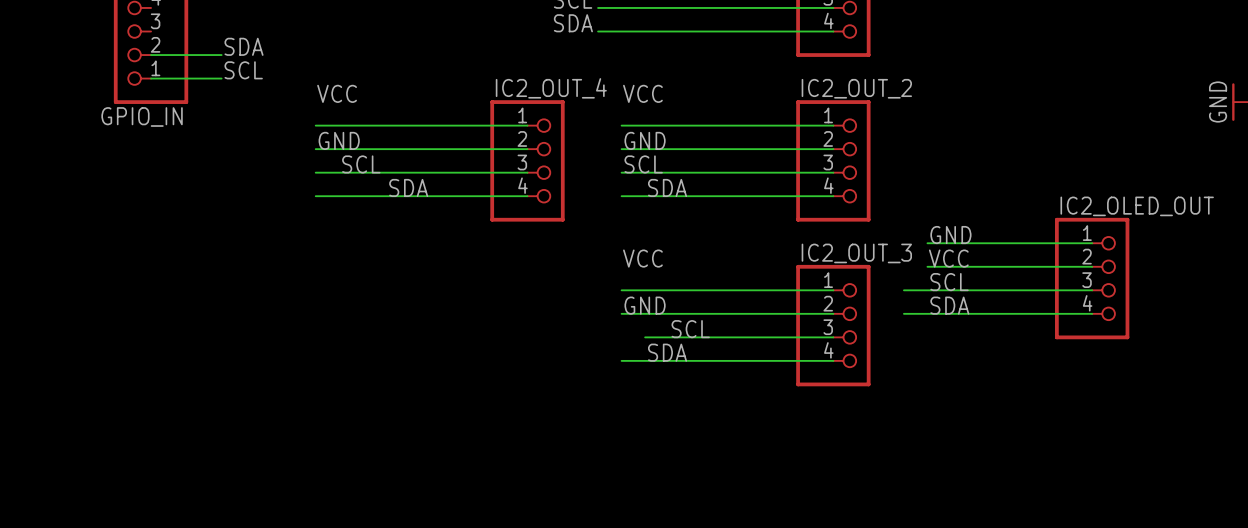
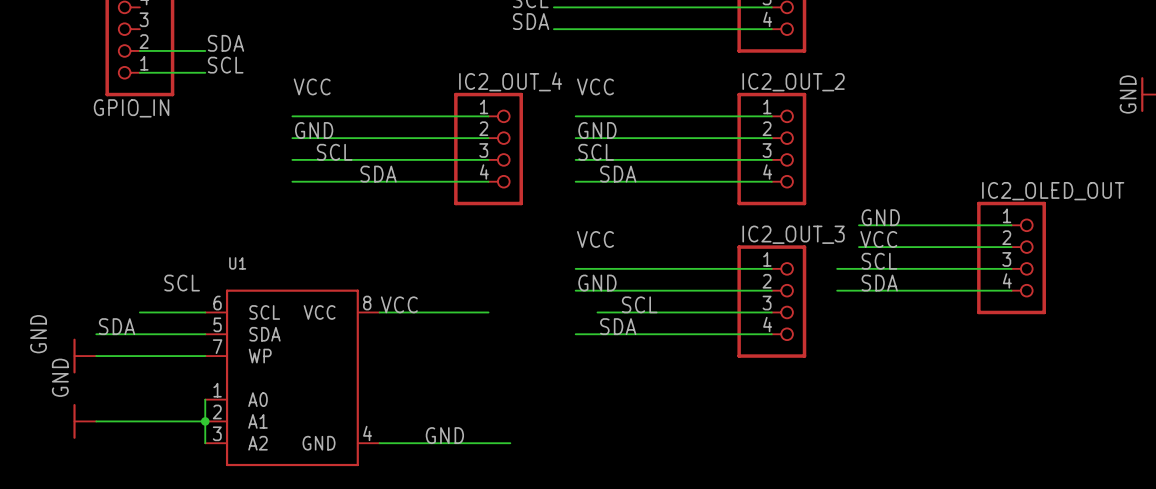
label: none -> SCL (182, 283)
label: none -> VCC (399, 304)
wire: none -> (139, 312) (205, 312)
wire: none -> (379, 312) (488, 312)
label: none -> SDA (117, 326)
wire: none -> (96, 334) (205, 334)
power symbol: none -> GND (84, 356)
wire: none -> (96, 356) (205, 356)
U1: none -> (292, 377)
wire: none -> (205, 399) (205, 443)
power symbol: none -> GND (84, 421)
wire: none -> (96, 421) (205, 421)
junction: none -> (205, 421)
label: none -> GND (444, 435)
wire: none -> (379, 443) (510, 443)

